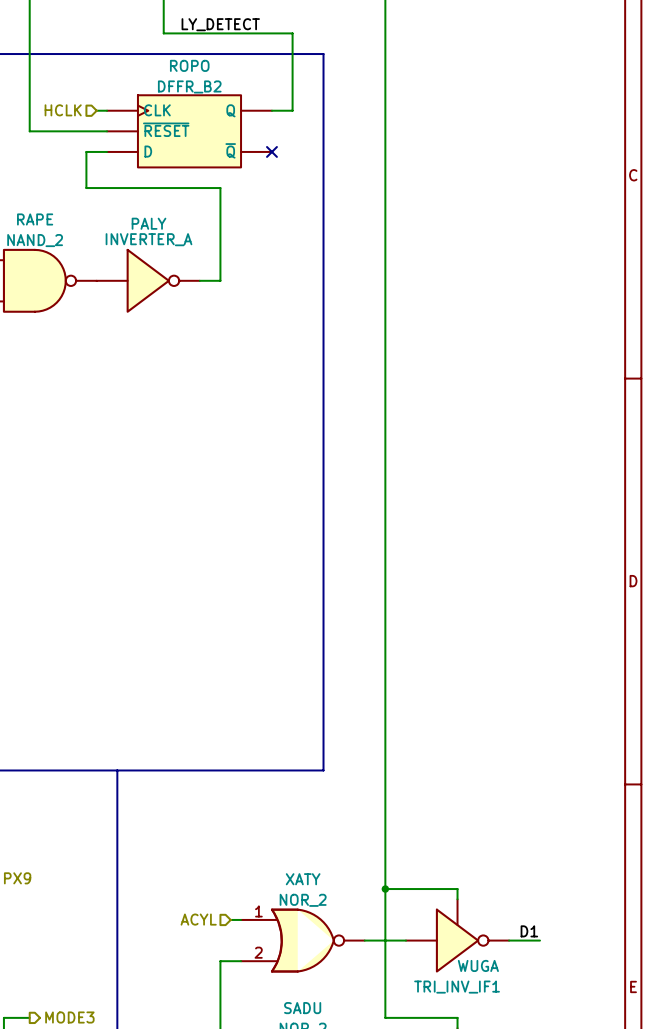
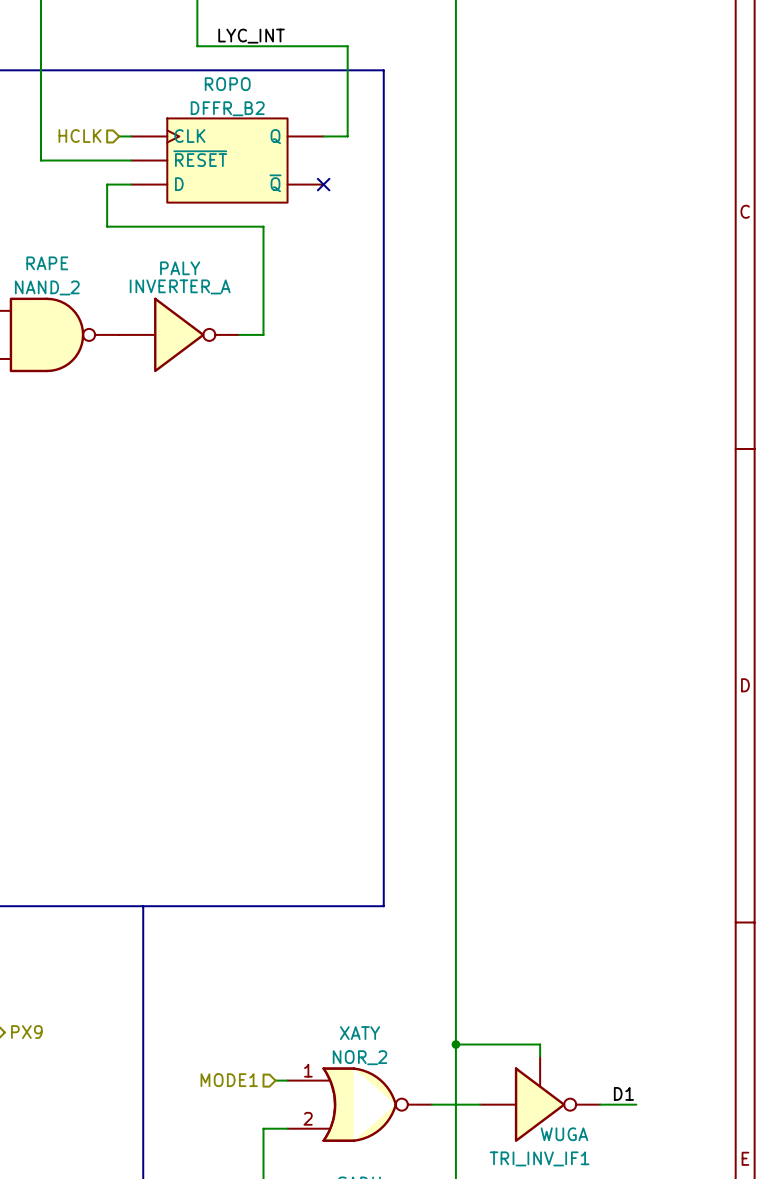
label: LY_DETECT (220, 24) -> LYC_INT (251, 36)
hierarchical label: ACYL (198, 919) -> MODE1 (229, 1080)

